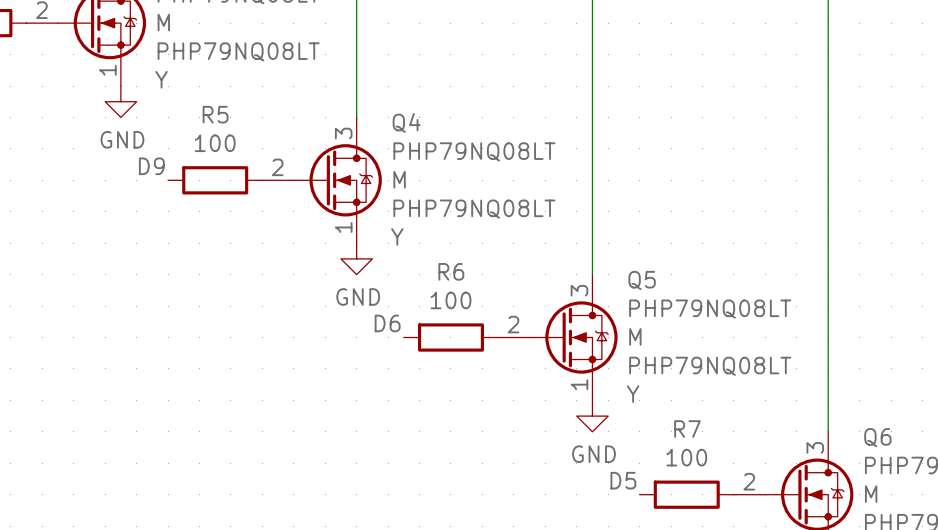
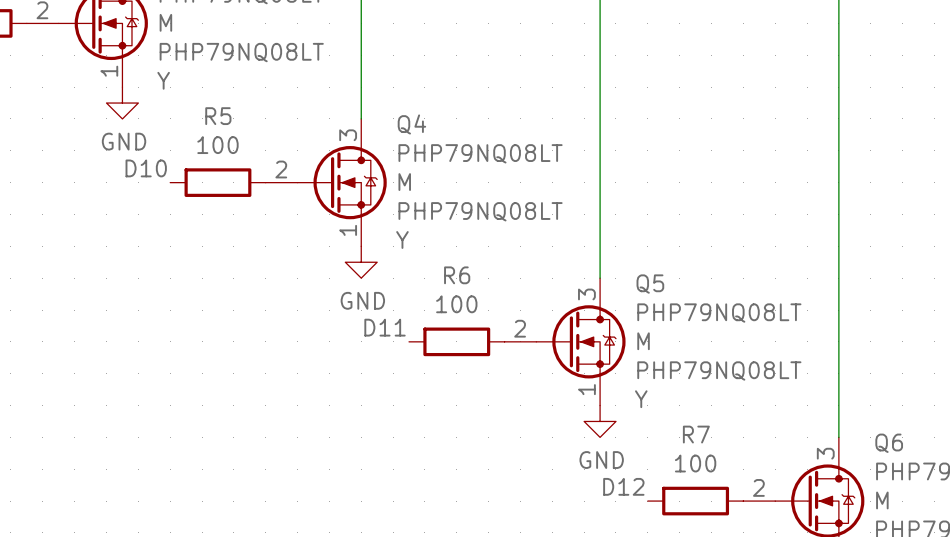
label: D9 (151, 166) -> D10 (146, 168)
label: D6 (387, 323) -> D11 (385, 327)
label: D5 (623, 480) -> D12 (623, 486)

